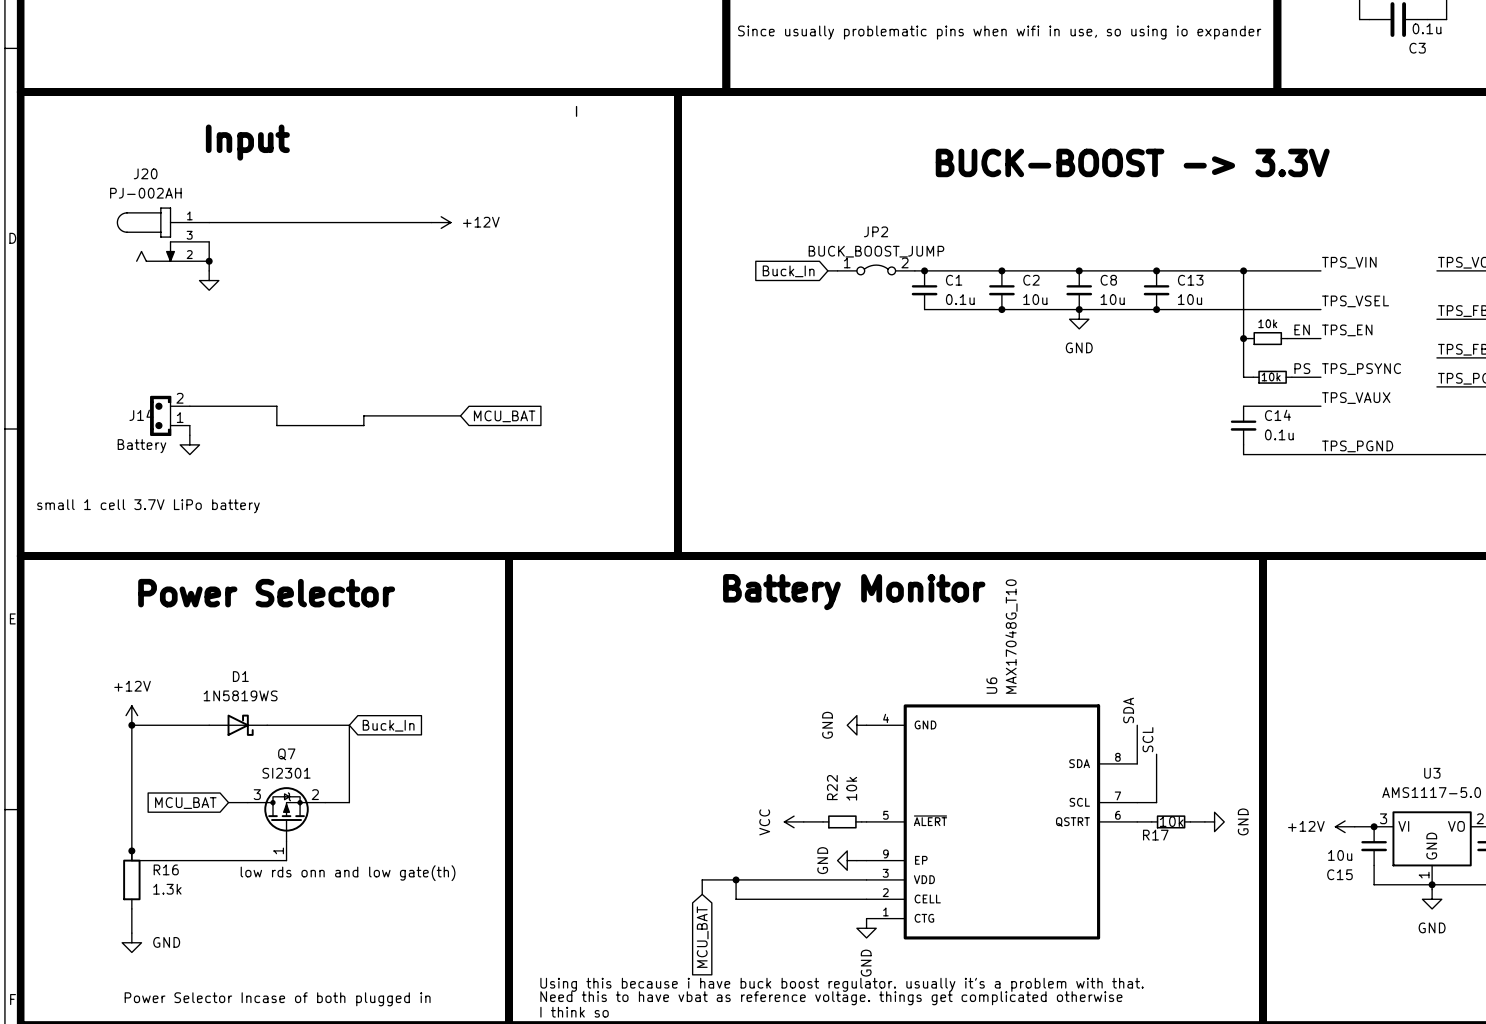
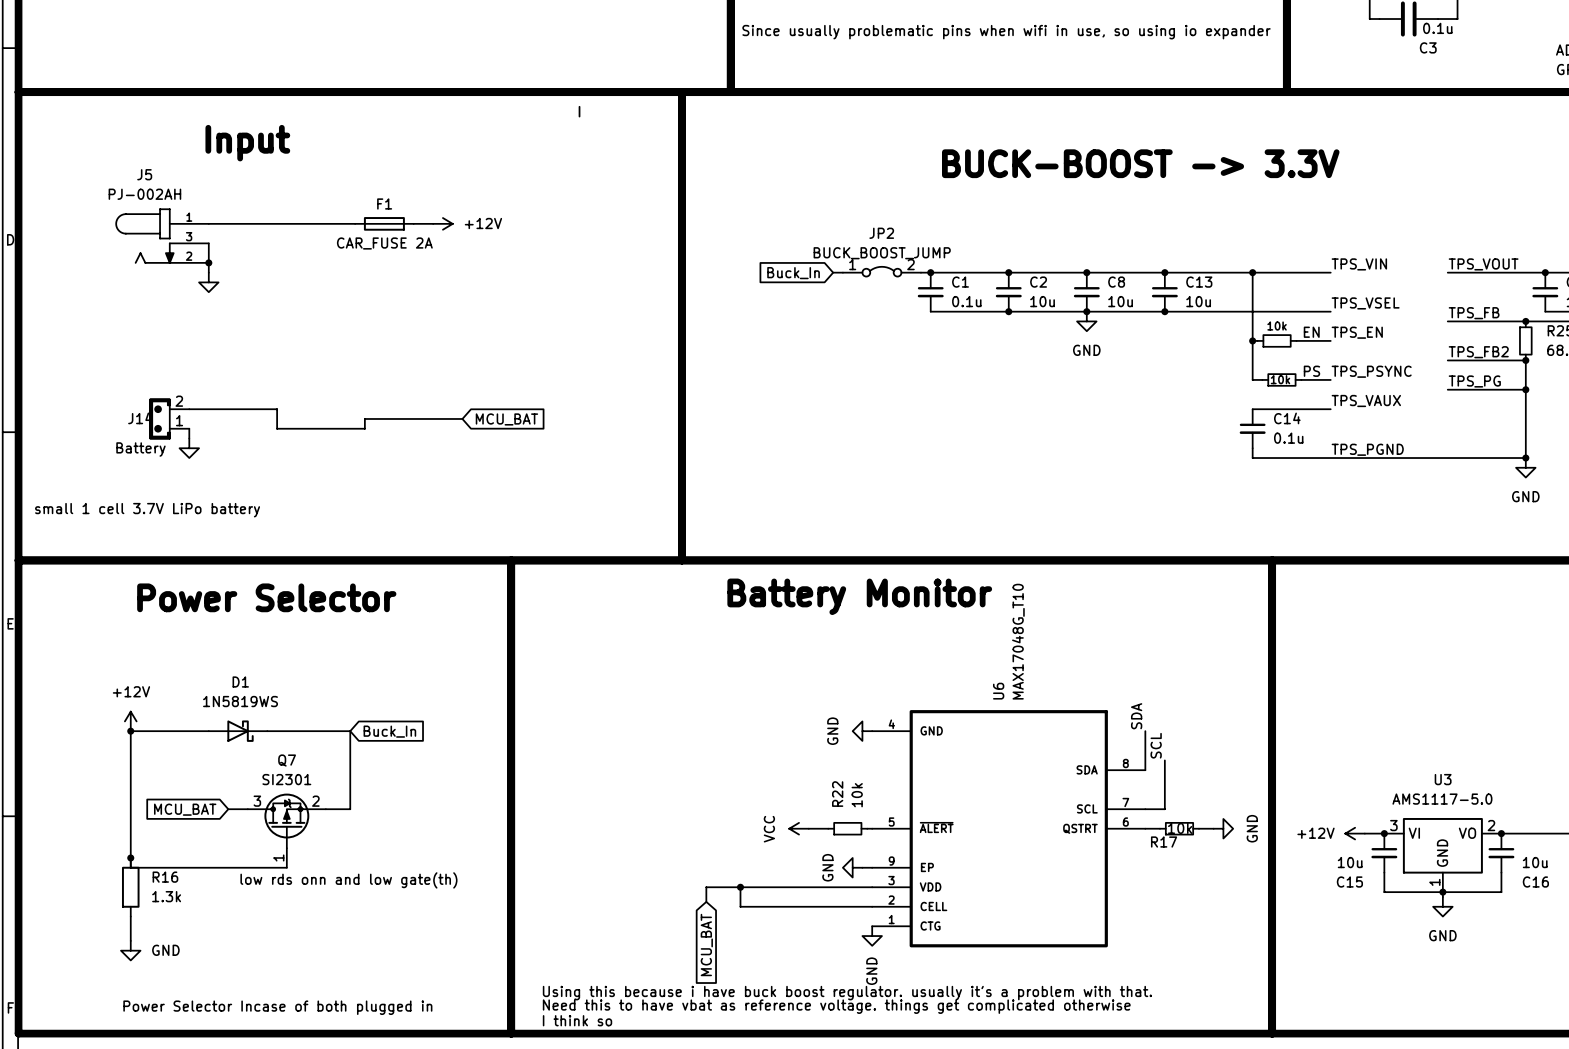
J20 name: J20 (145, 173) -> J5 (144, 174)
F1: none -> CAR_FUSE 2A (384, 223)

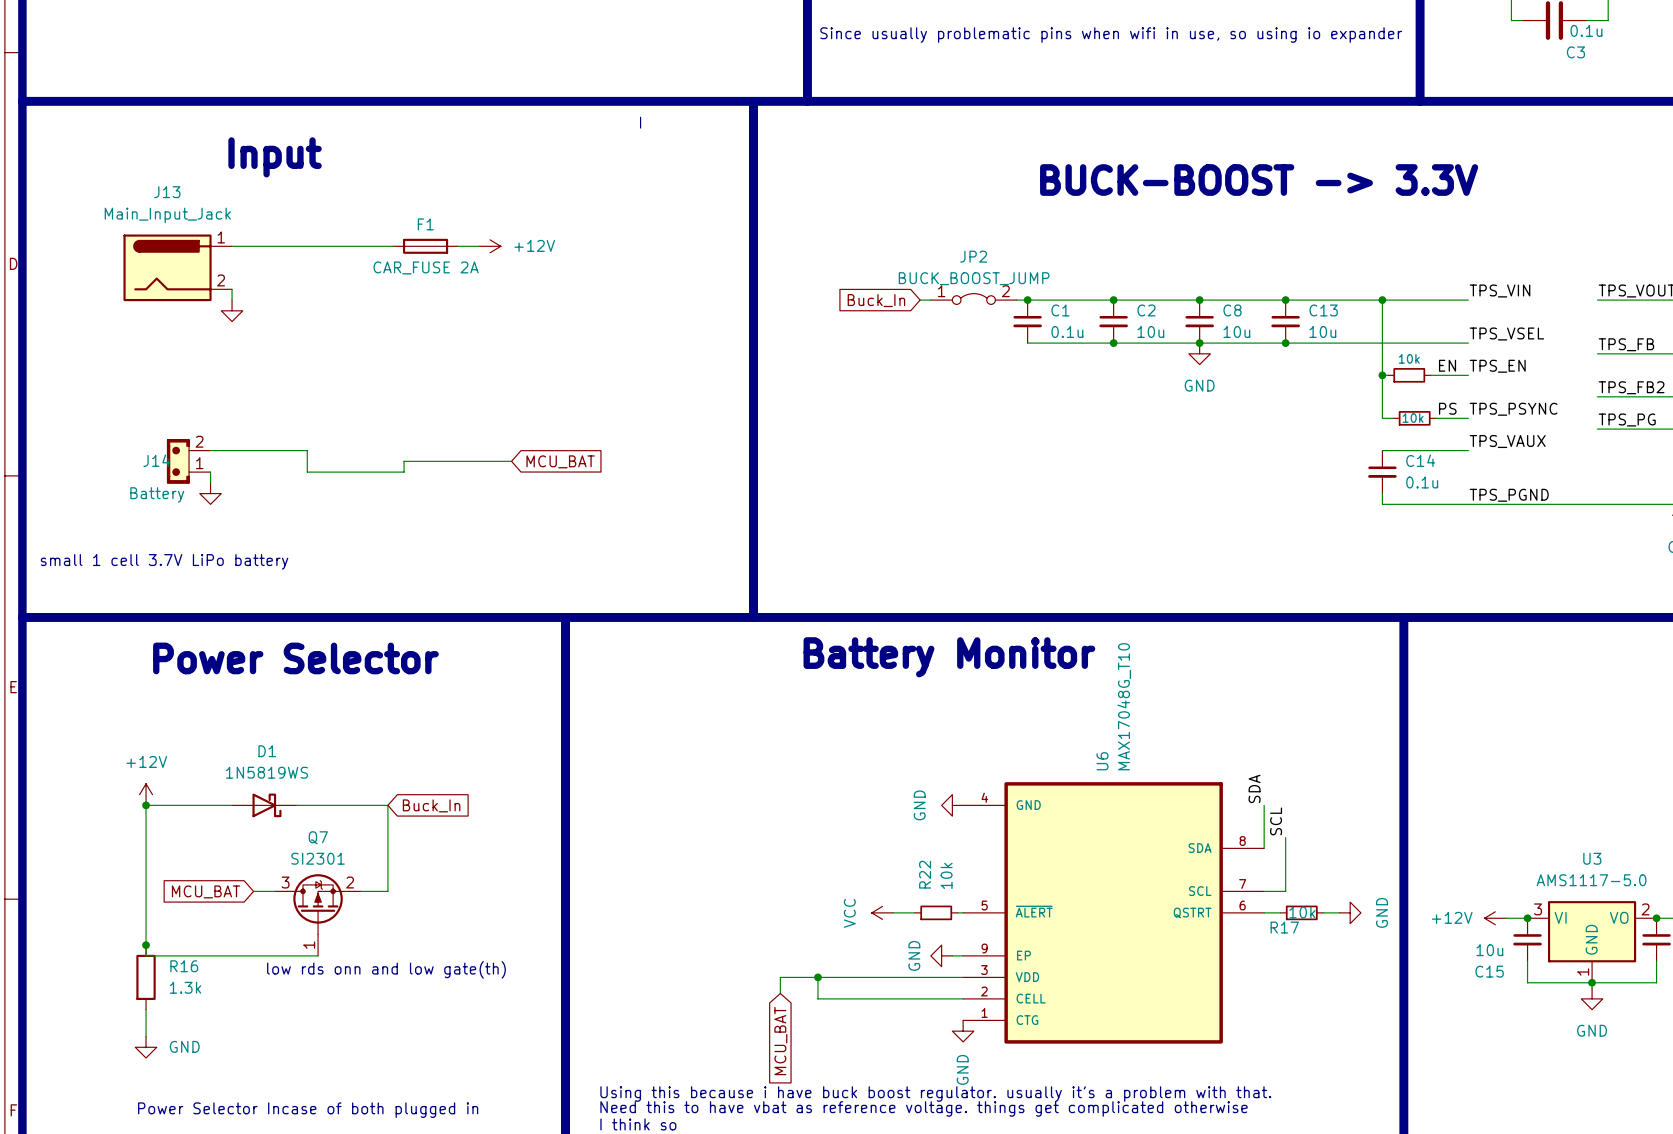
J5: PJ-002AH (162, 236) -> none
J13: none -> Main_Input_Jack (177, 267)
wire: (208, 243) (208, 262) -> none
junction: (208, 262) -> none

